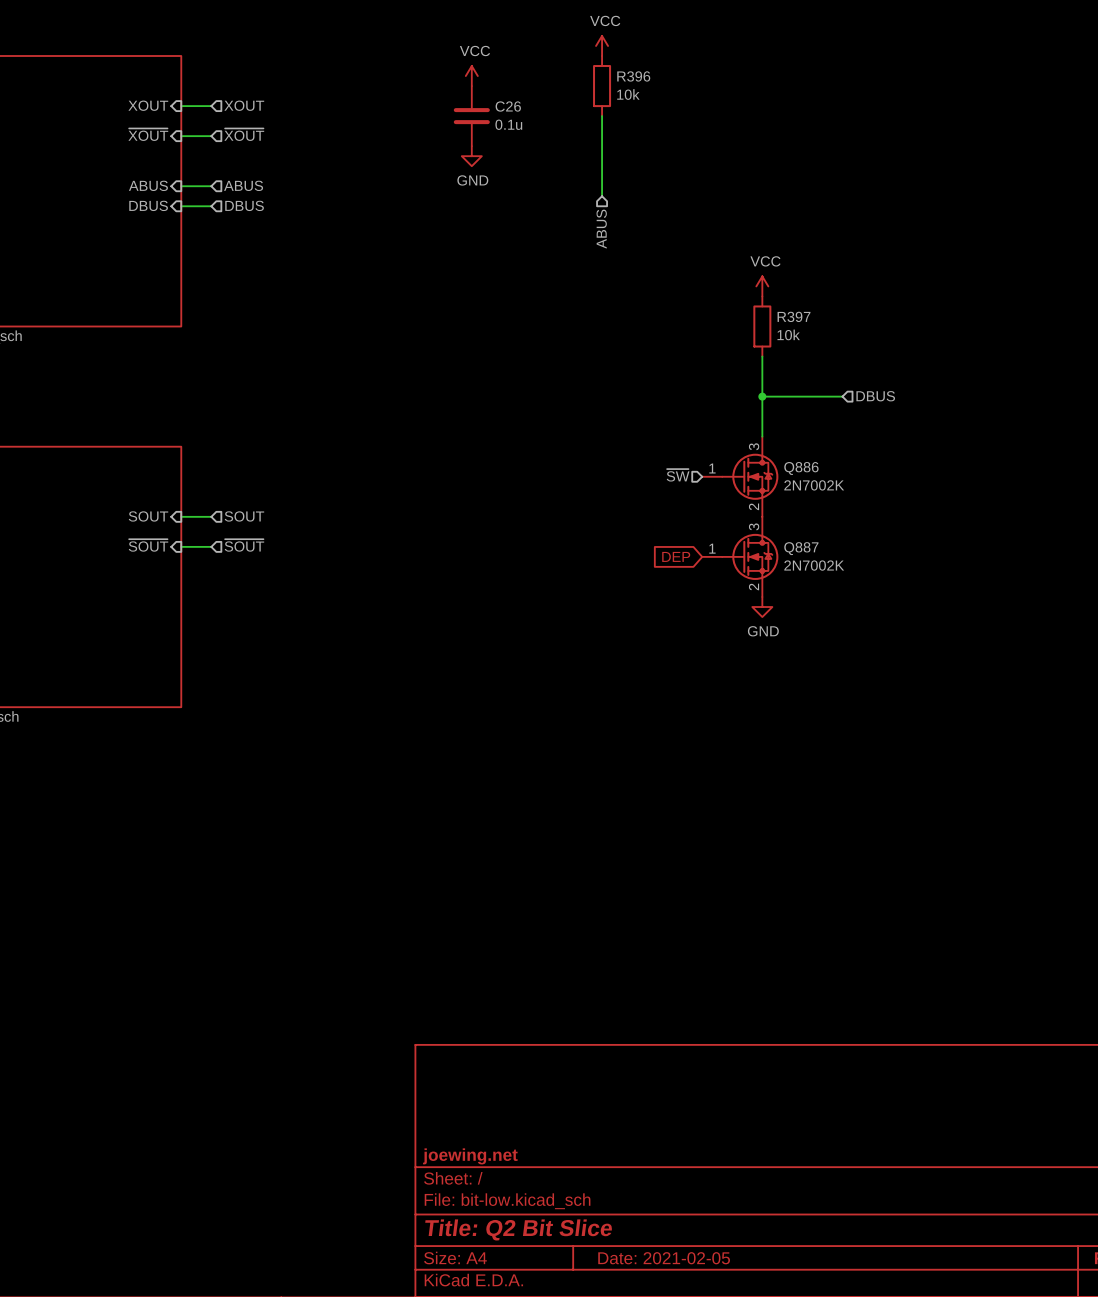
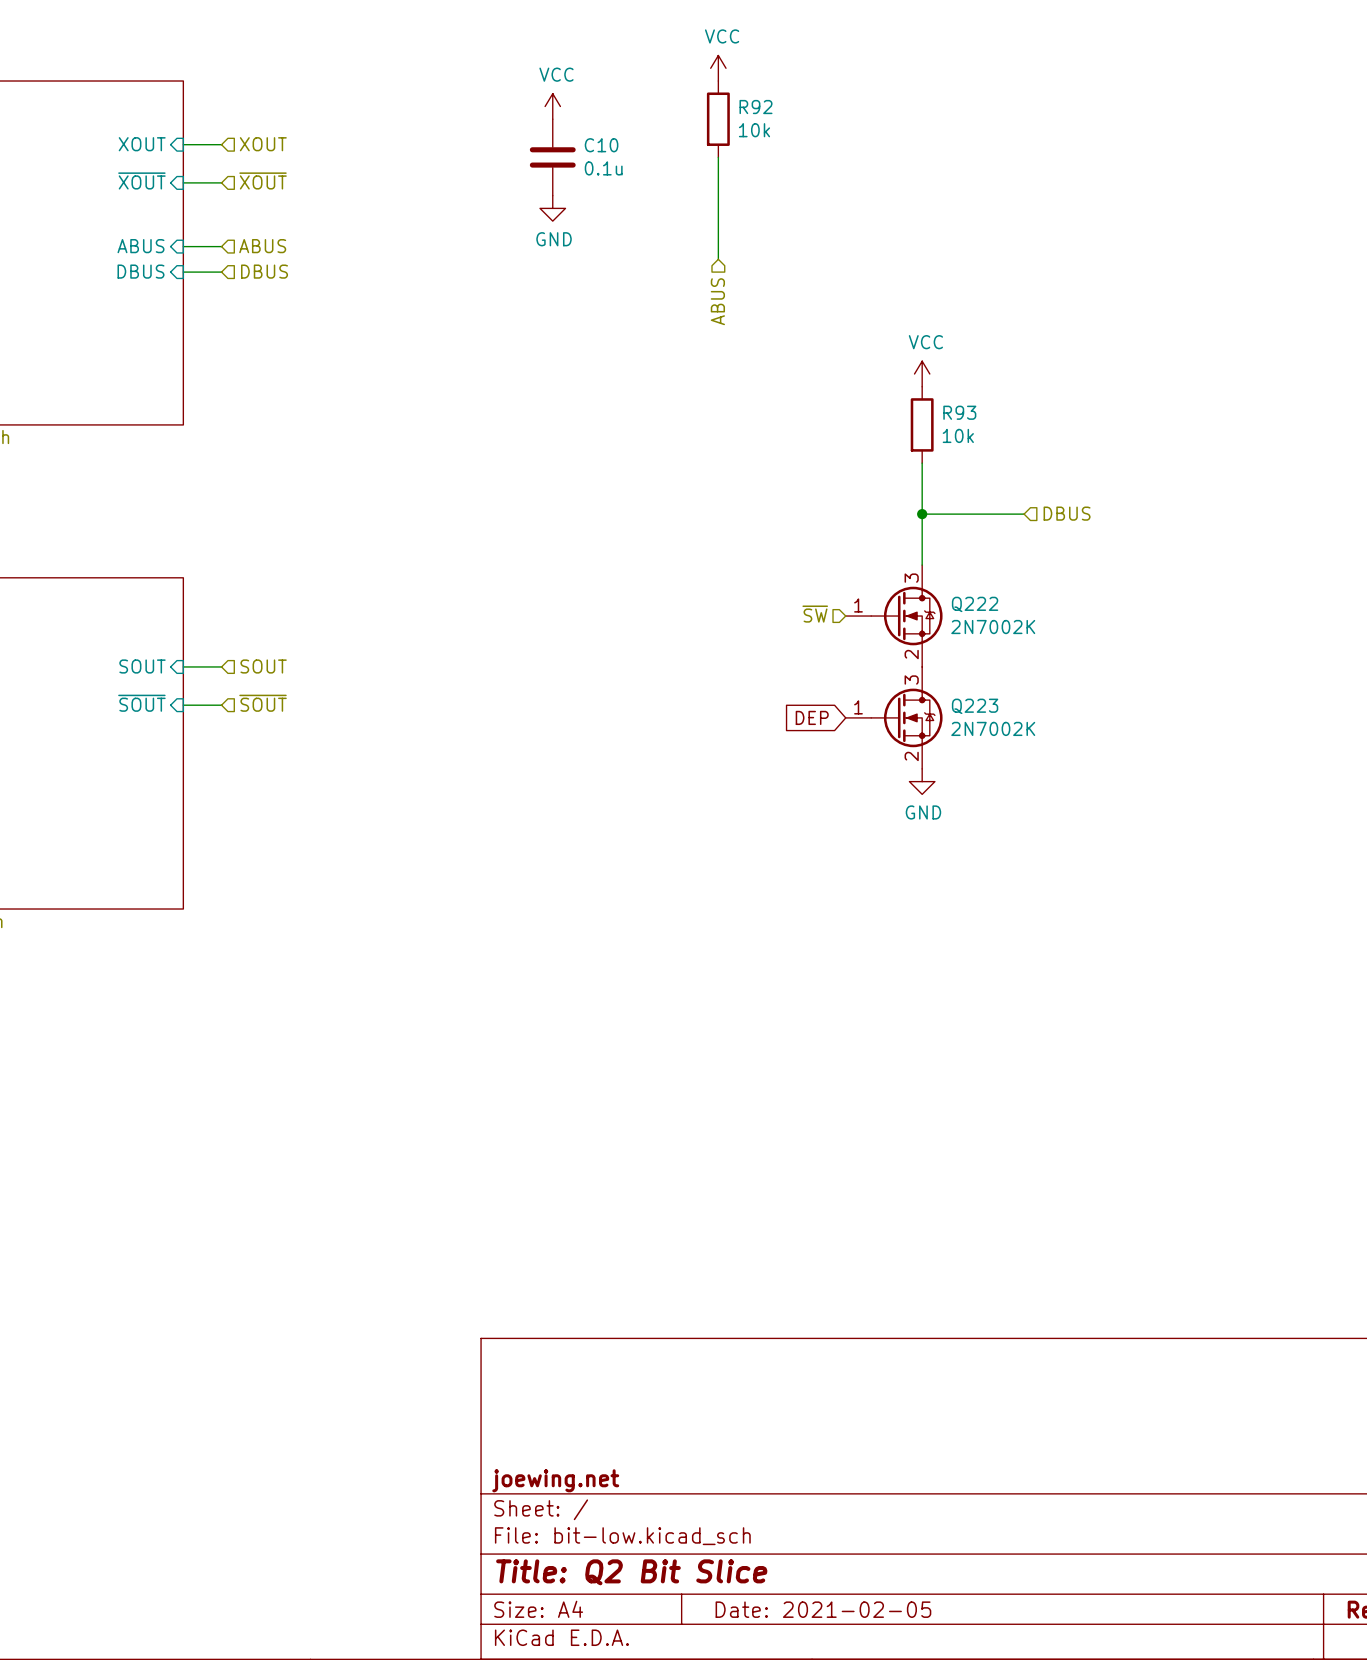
R396 name: R396 (633, 76) -> R92 (756, 107)
C26 name: C26 (508, 106) -> C10 (601, 145)
R397 name: R397 (794, 316) -> R93 (959, 412)
Q886 name: Q886 (801, 468) -> Q222 (975, 604)
Q887 name: Q887 (801, 548) -> Q223 (975, 706)

